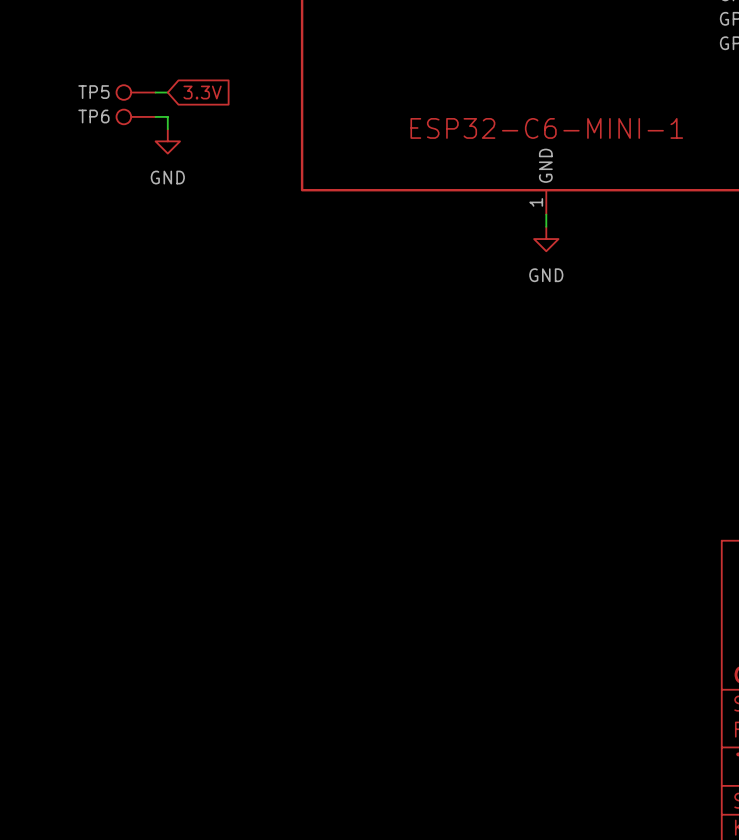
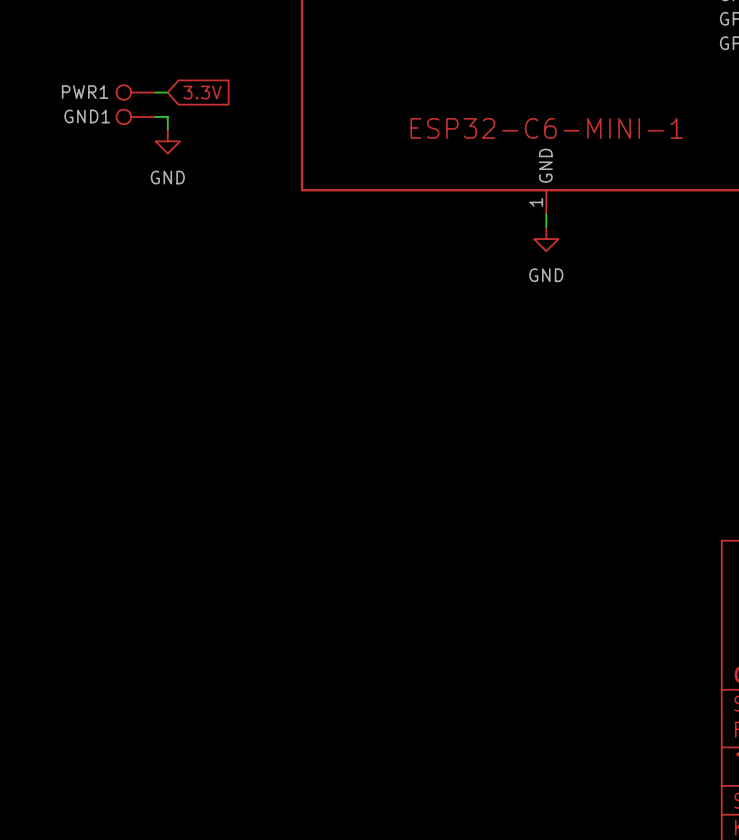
TP5 name: TP5 (93, 92) -> PWR1 (85, 92)
TP6 name: TP6 (93, 116) -> GND1 (87, 116)

